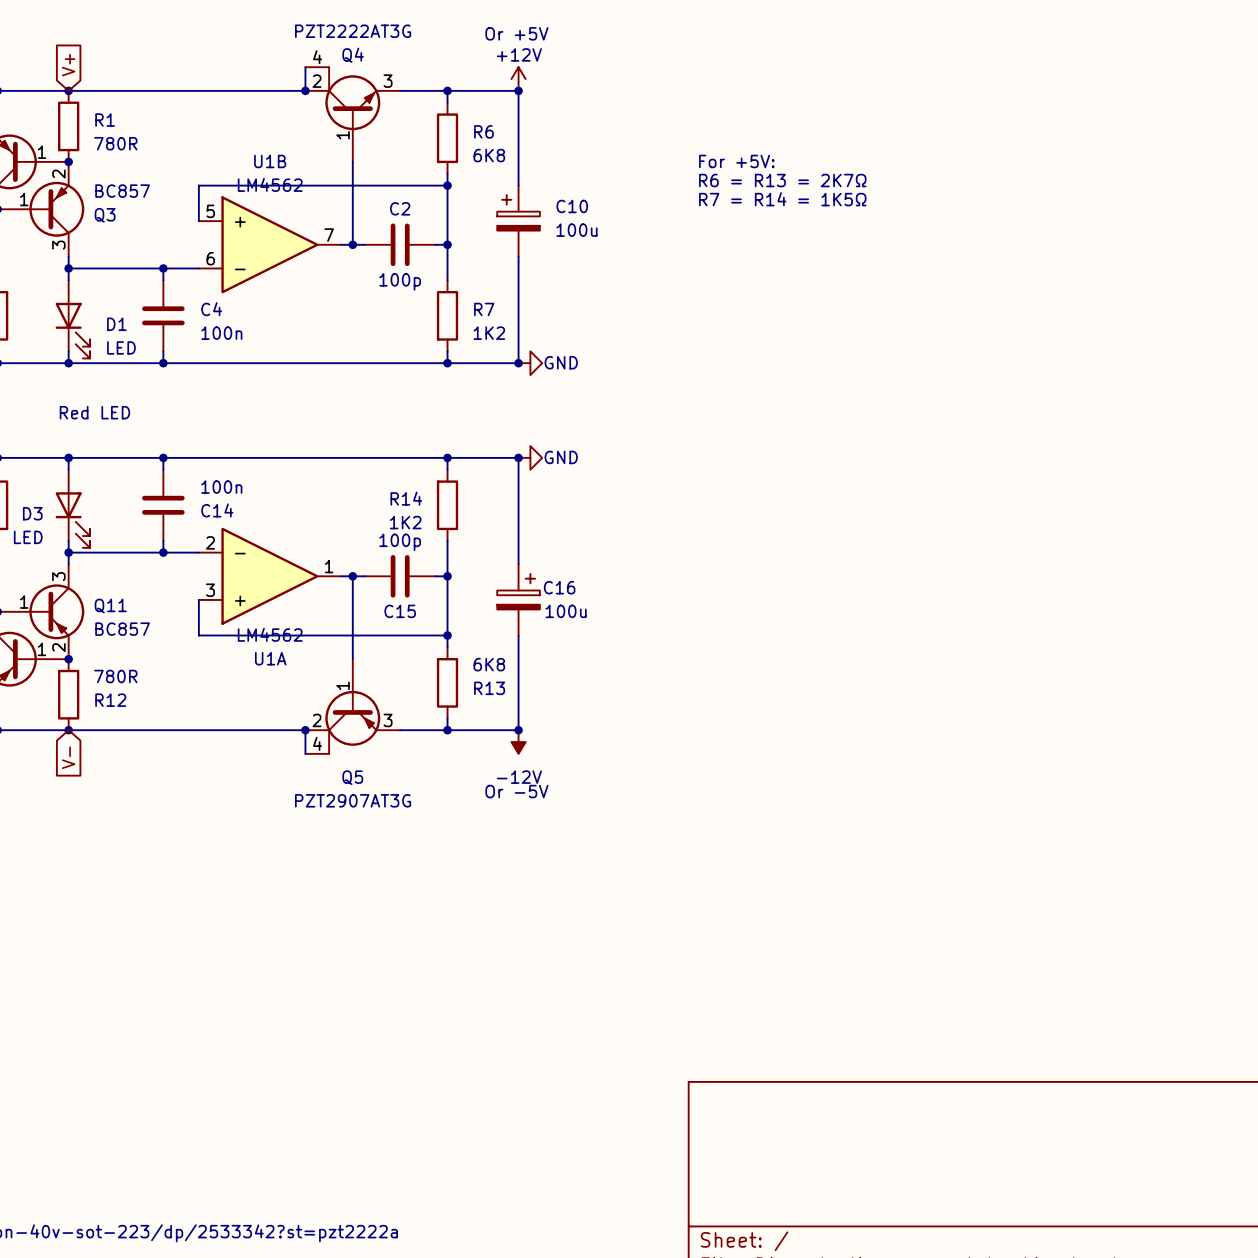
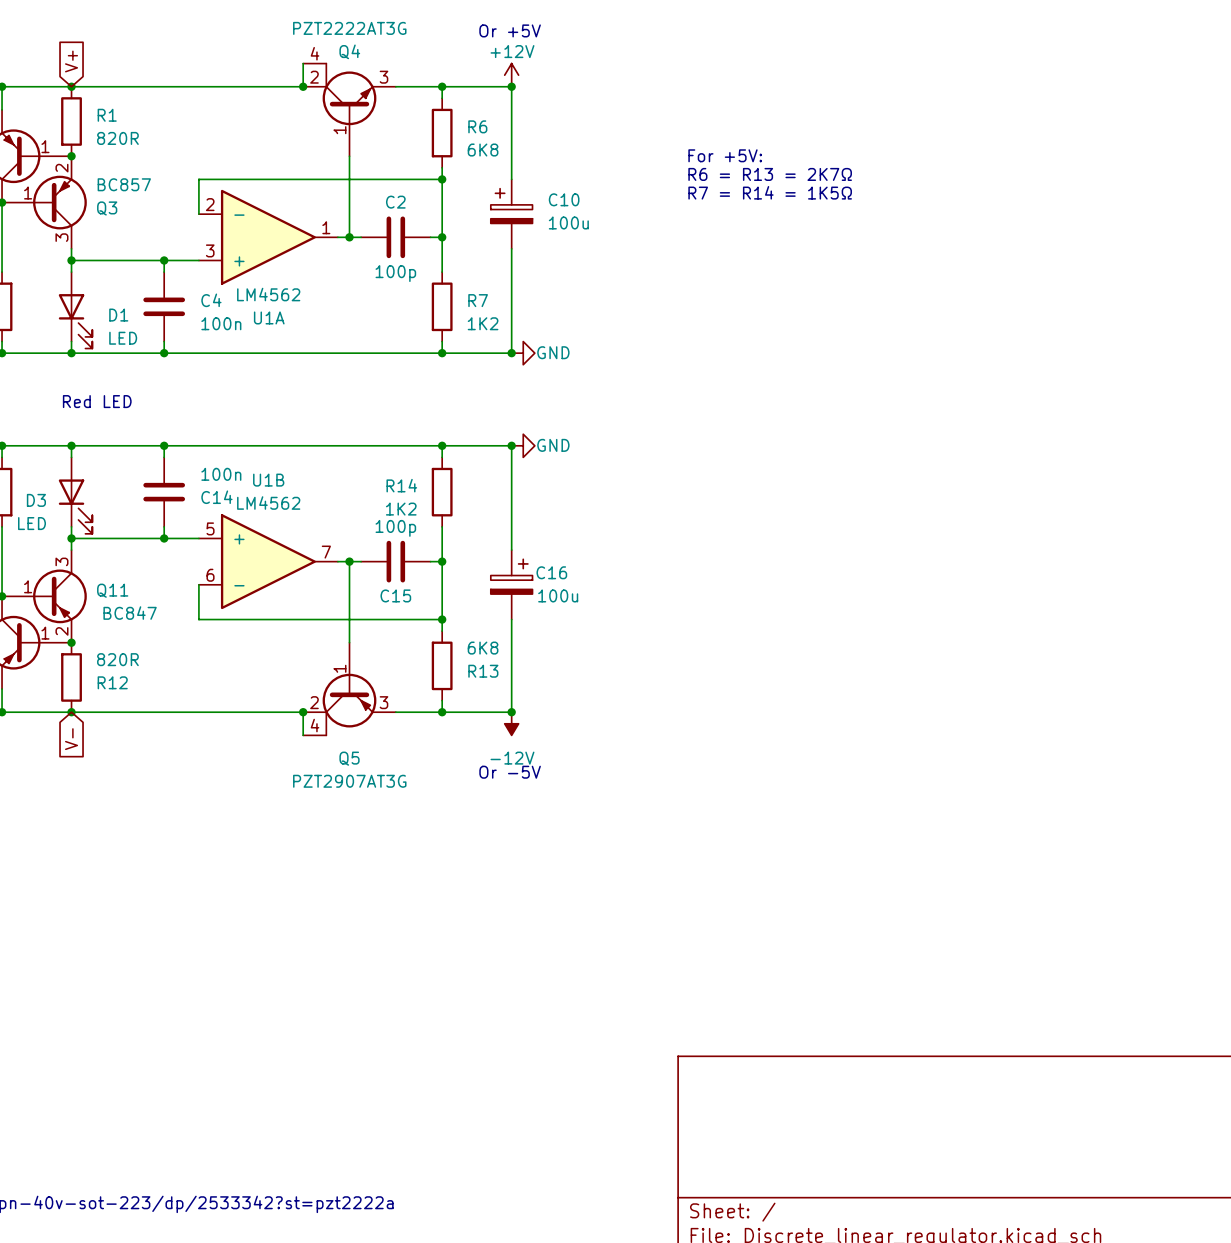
R1 value: 780R (115, 143) -> 820R (117, 138)
U1B position: (269, 244) -> (268, 561)
U1A position: (269, 576) -> (268, 237)
Q11 value: BC857 (122, 629) -> BC847 (130, 613)
R12 value: 780R (115, 676) -> 820R (117, 659)

